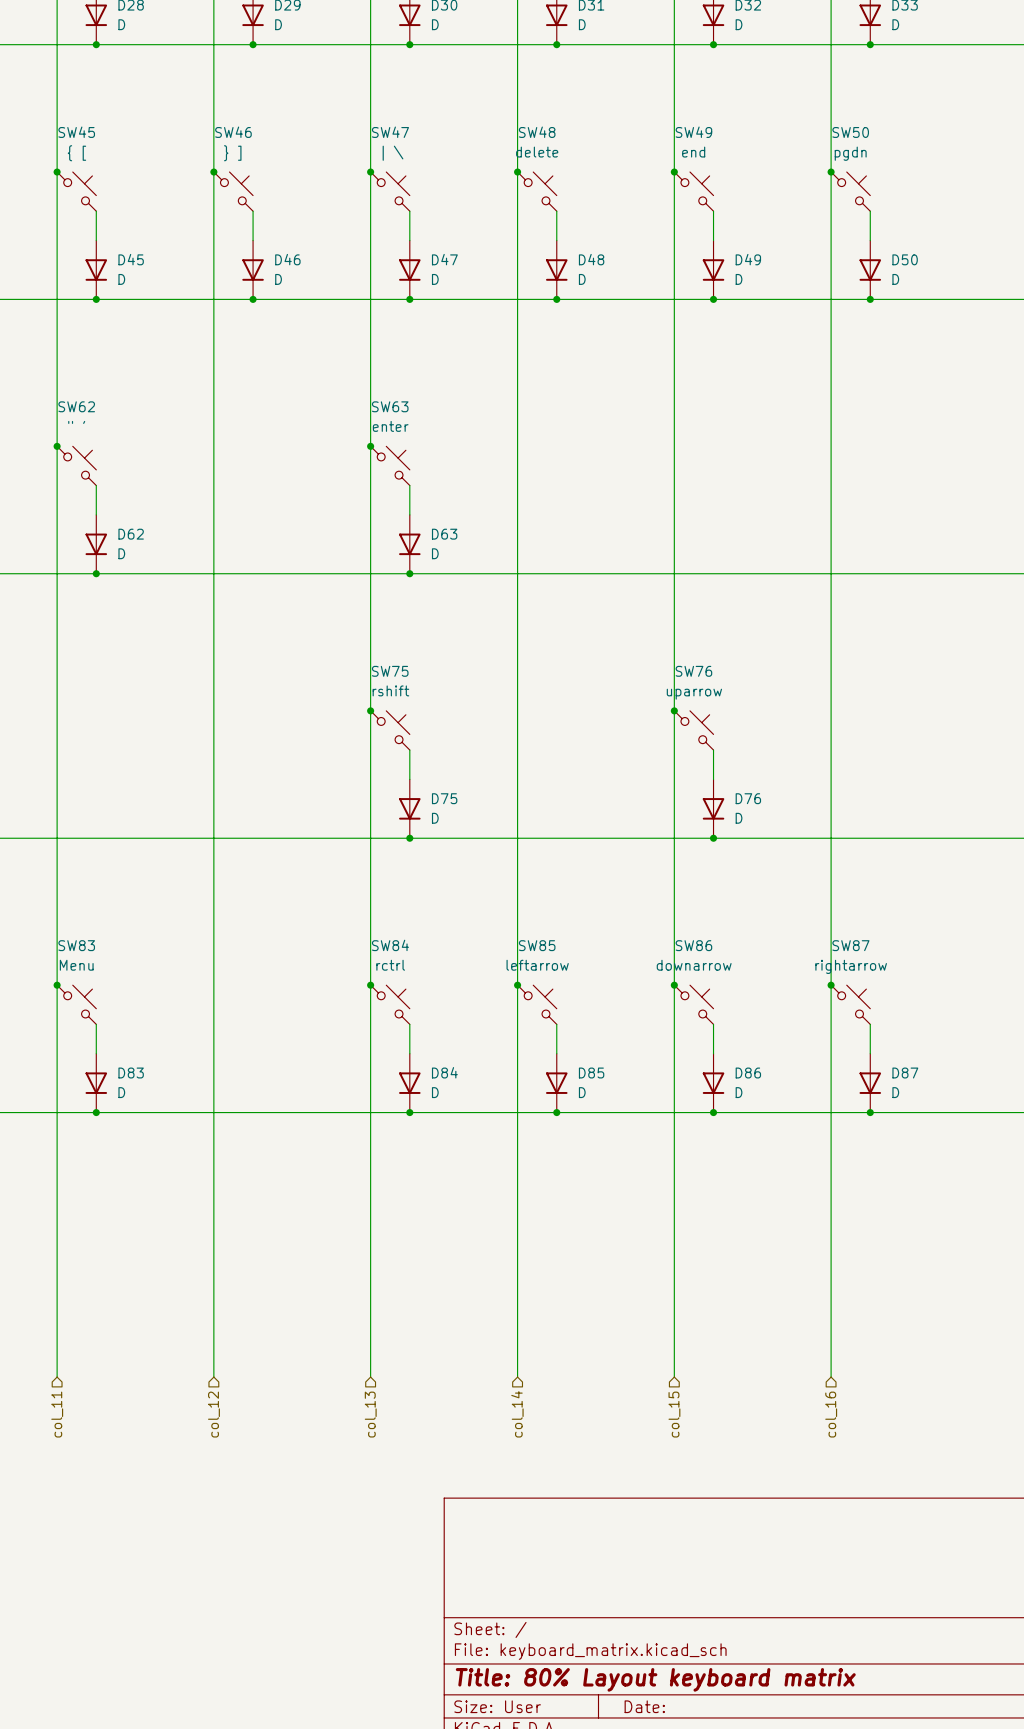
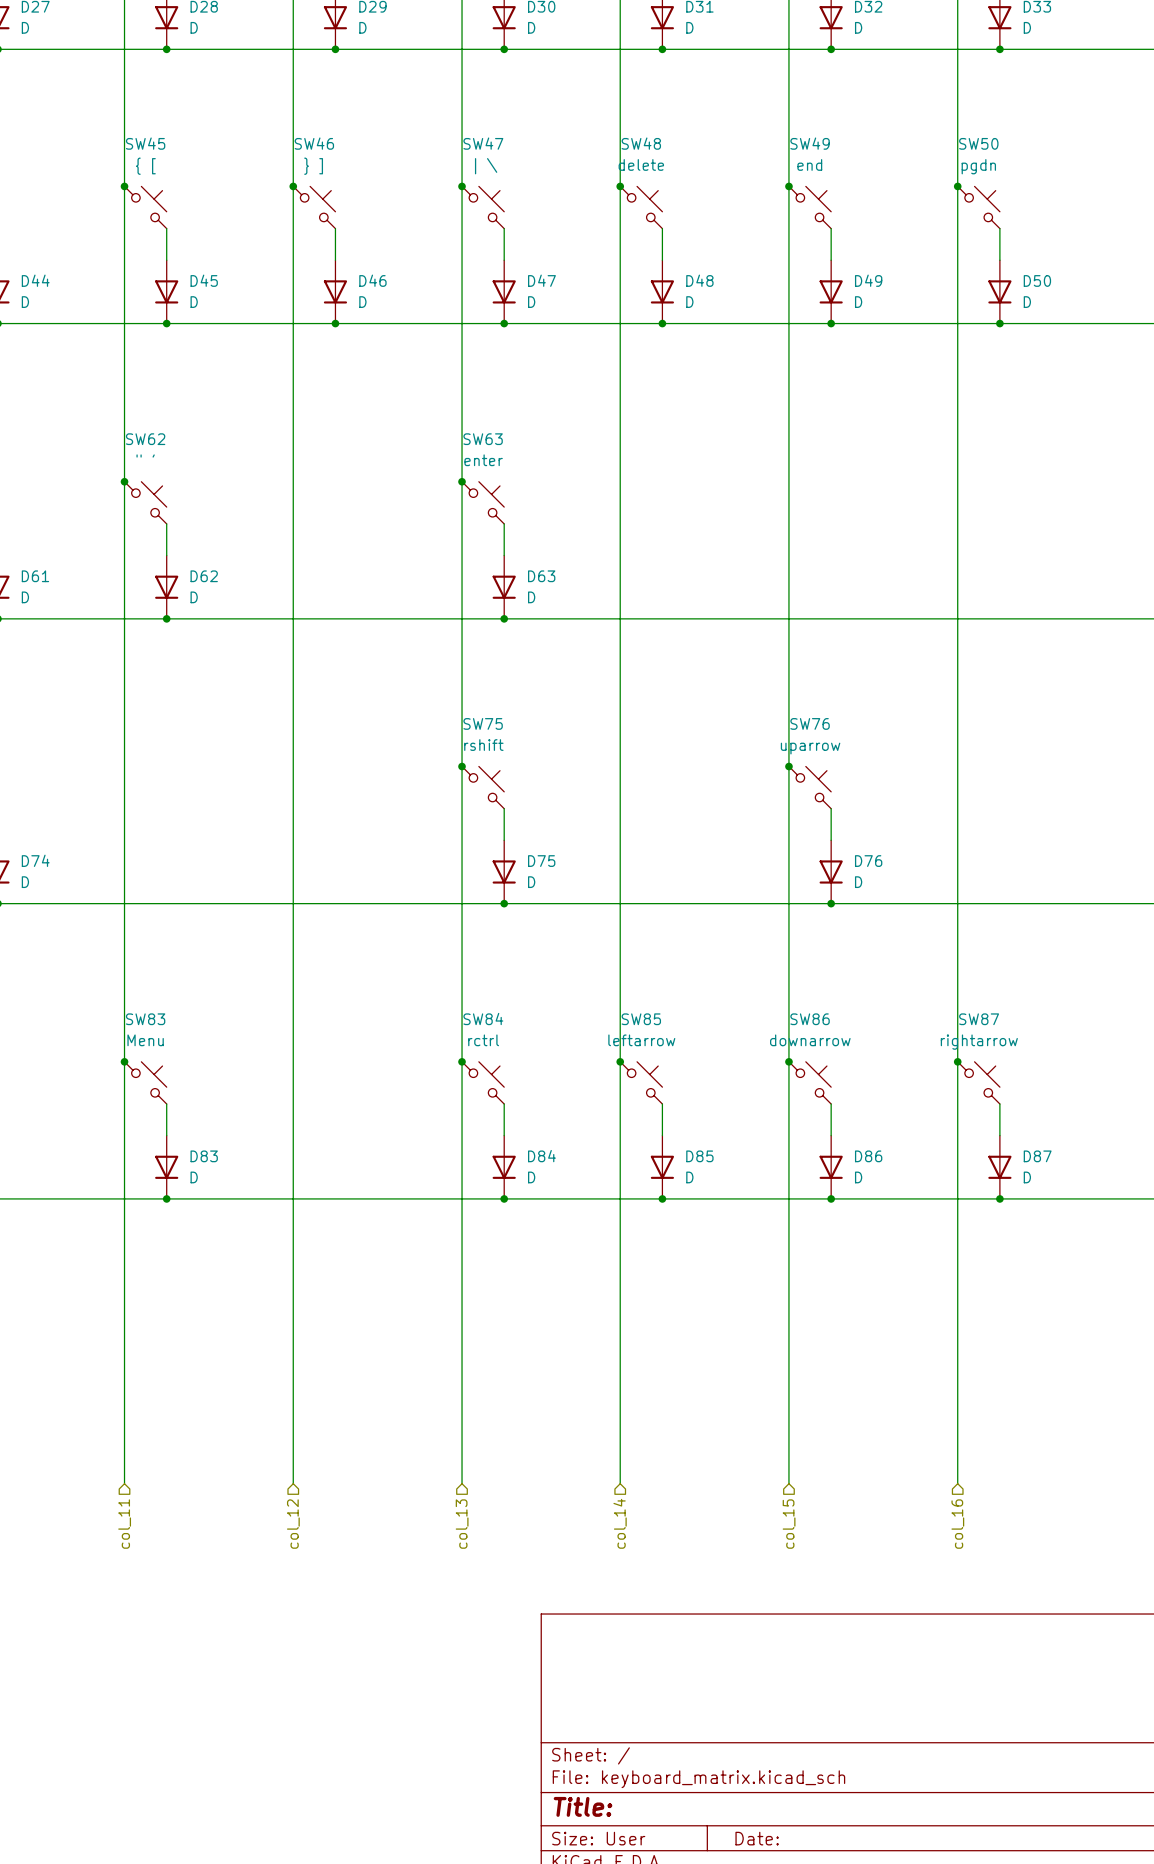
title block: Title: 80% Layout keyboard matrix (655, 1679) -> Title: (583, 1806)

